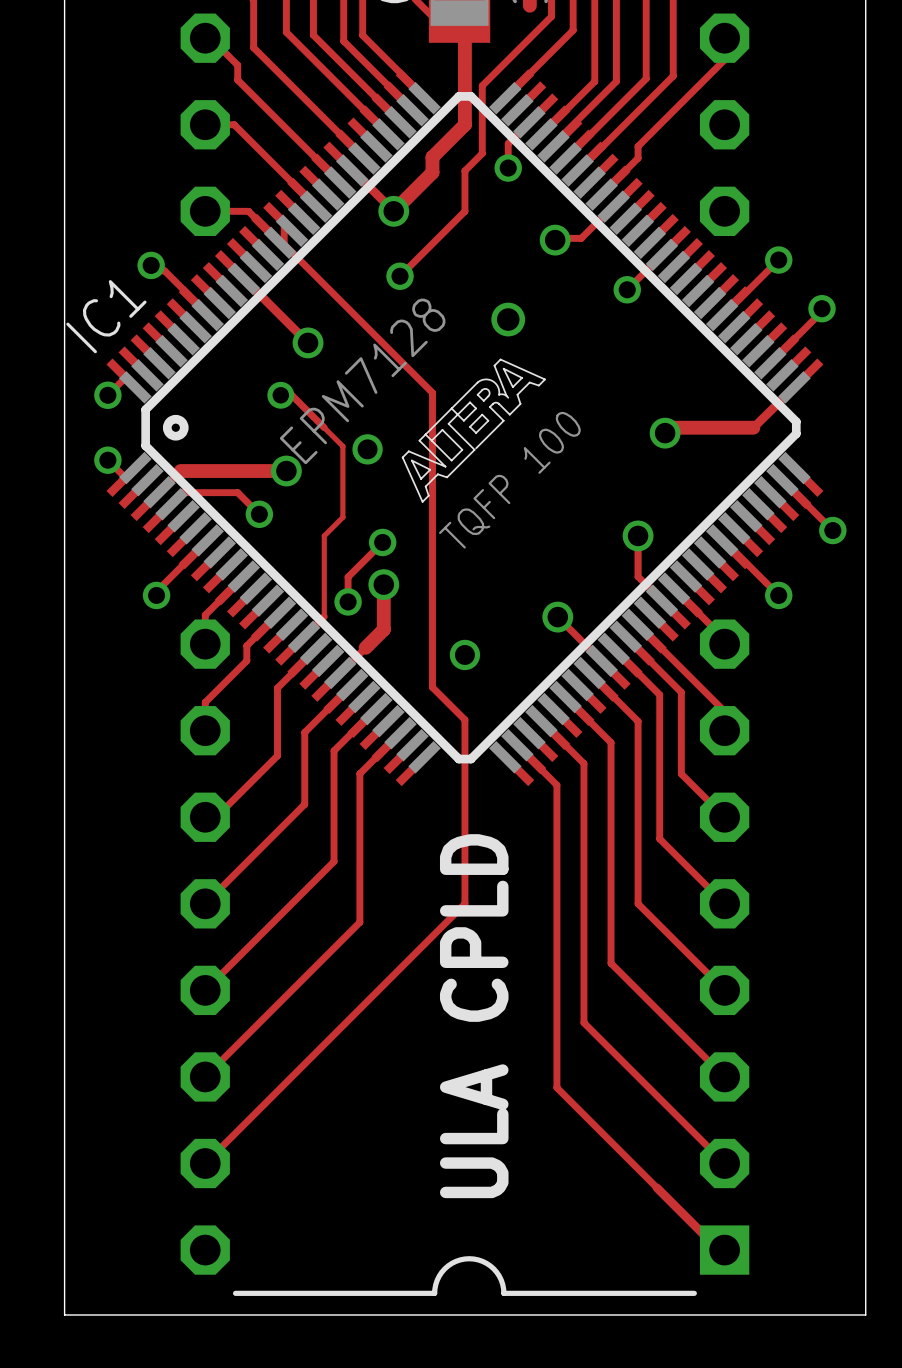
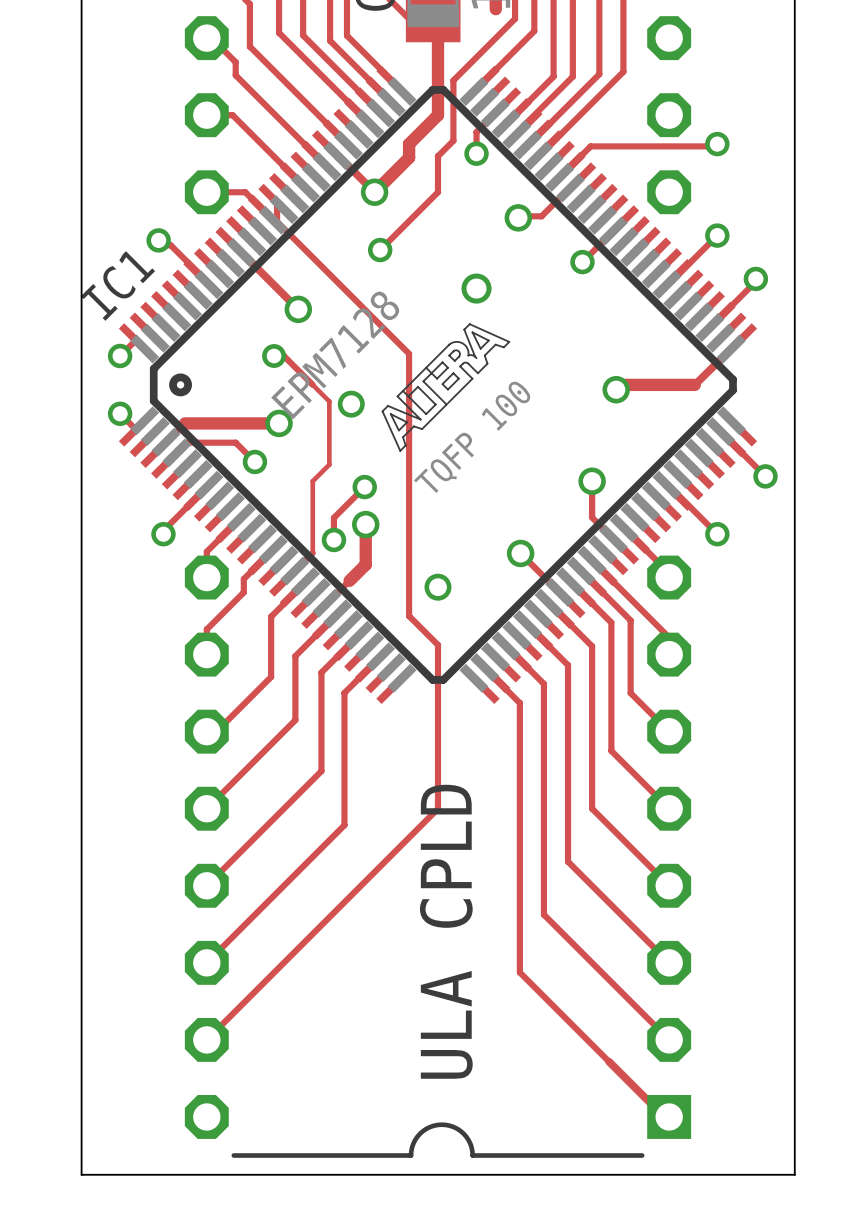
track: (724, 38) (724, 59) (638, 146) (636, 159) -> (717, 144) (715, 146) (590, 146)
via: none -> (717, 144)

